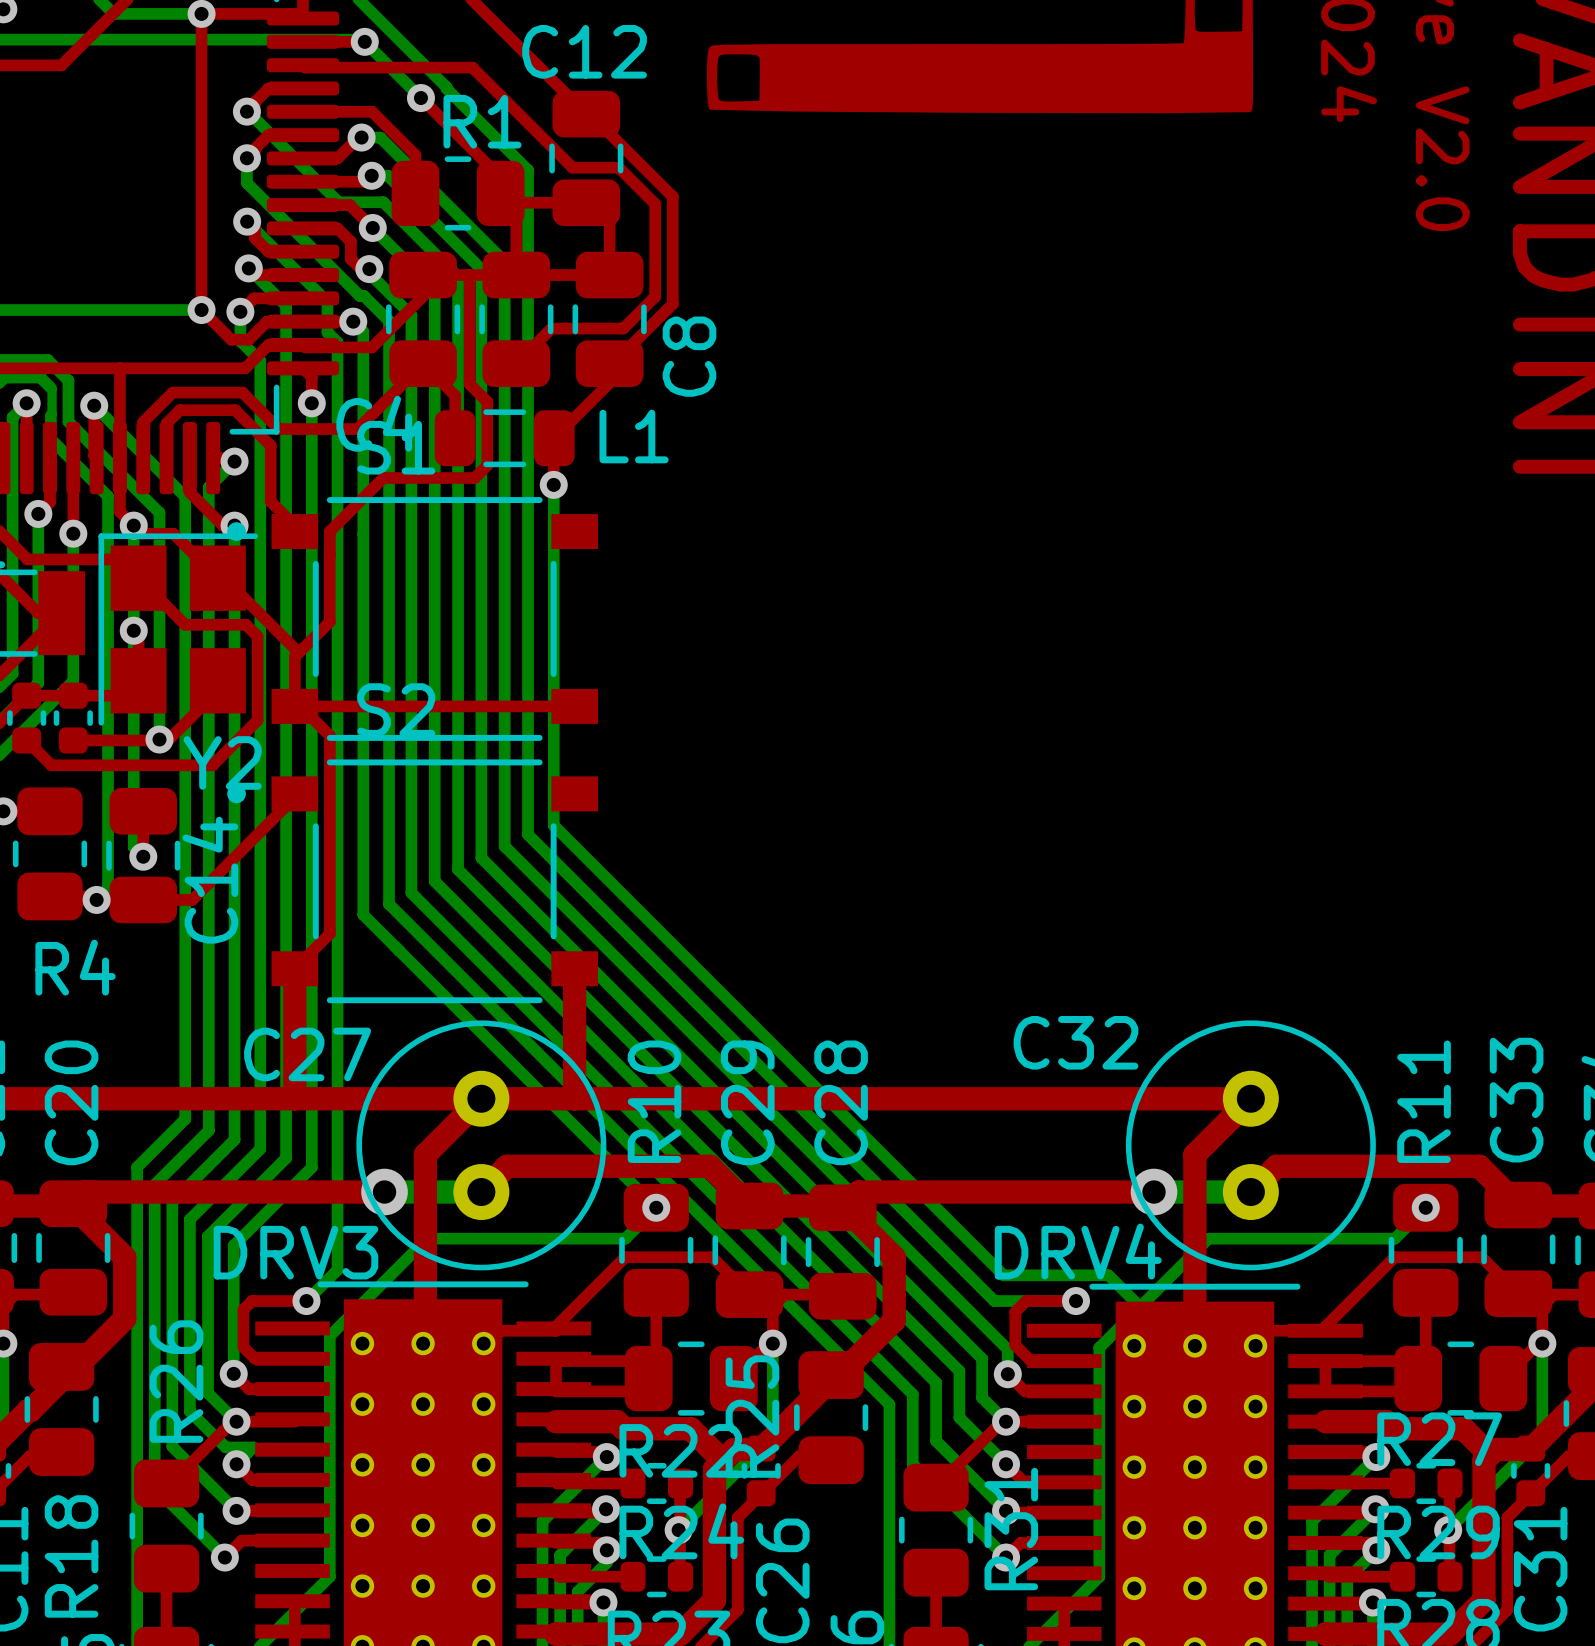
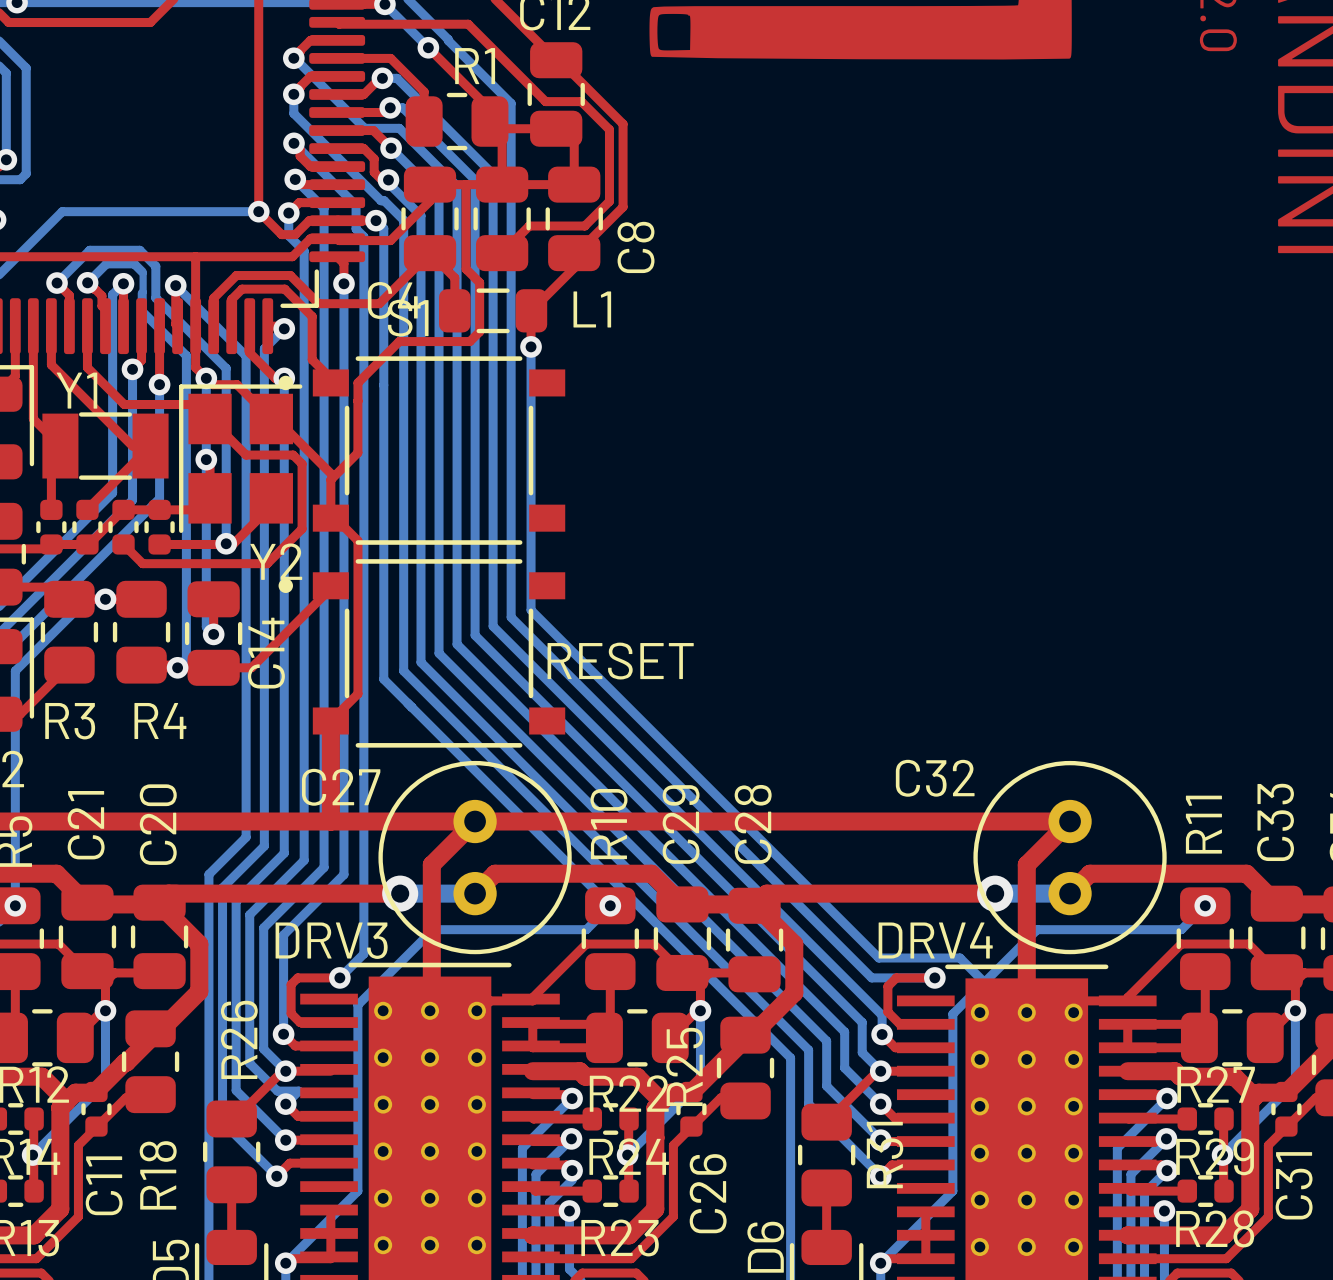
top track: (294, 706) (574, 706) -> none
S2 name: S2 (396, 710) -> RESET (620, 661)
top track: (574, 968) (574, 1098) -> none

